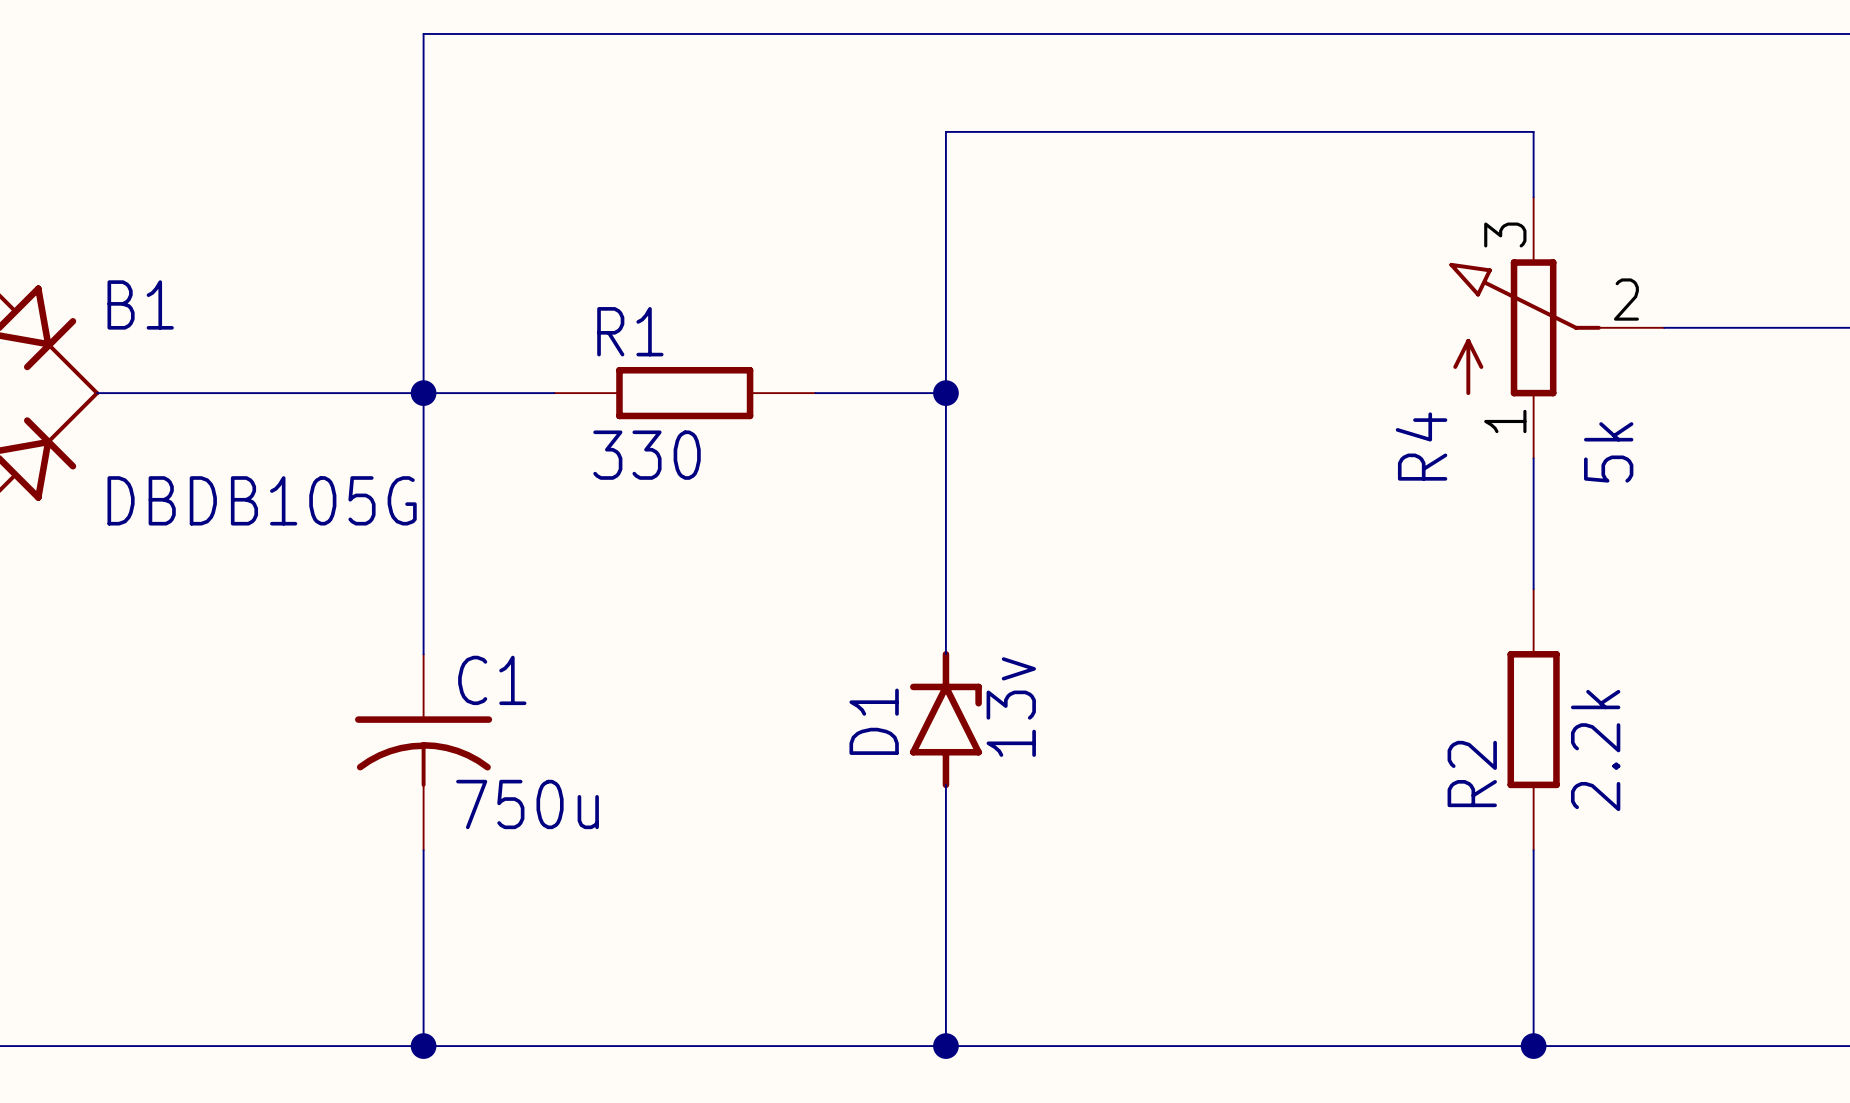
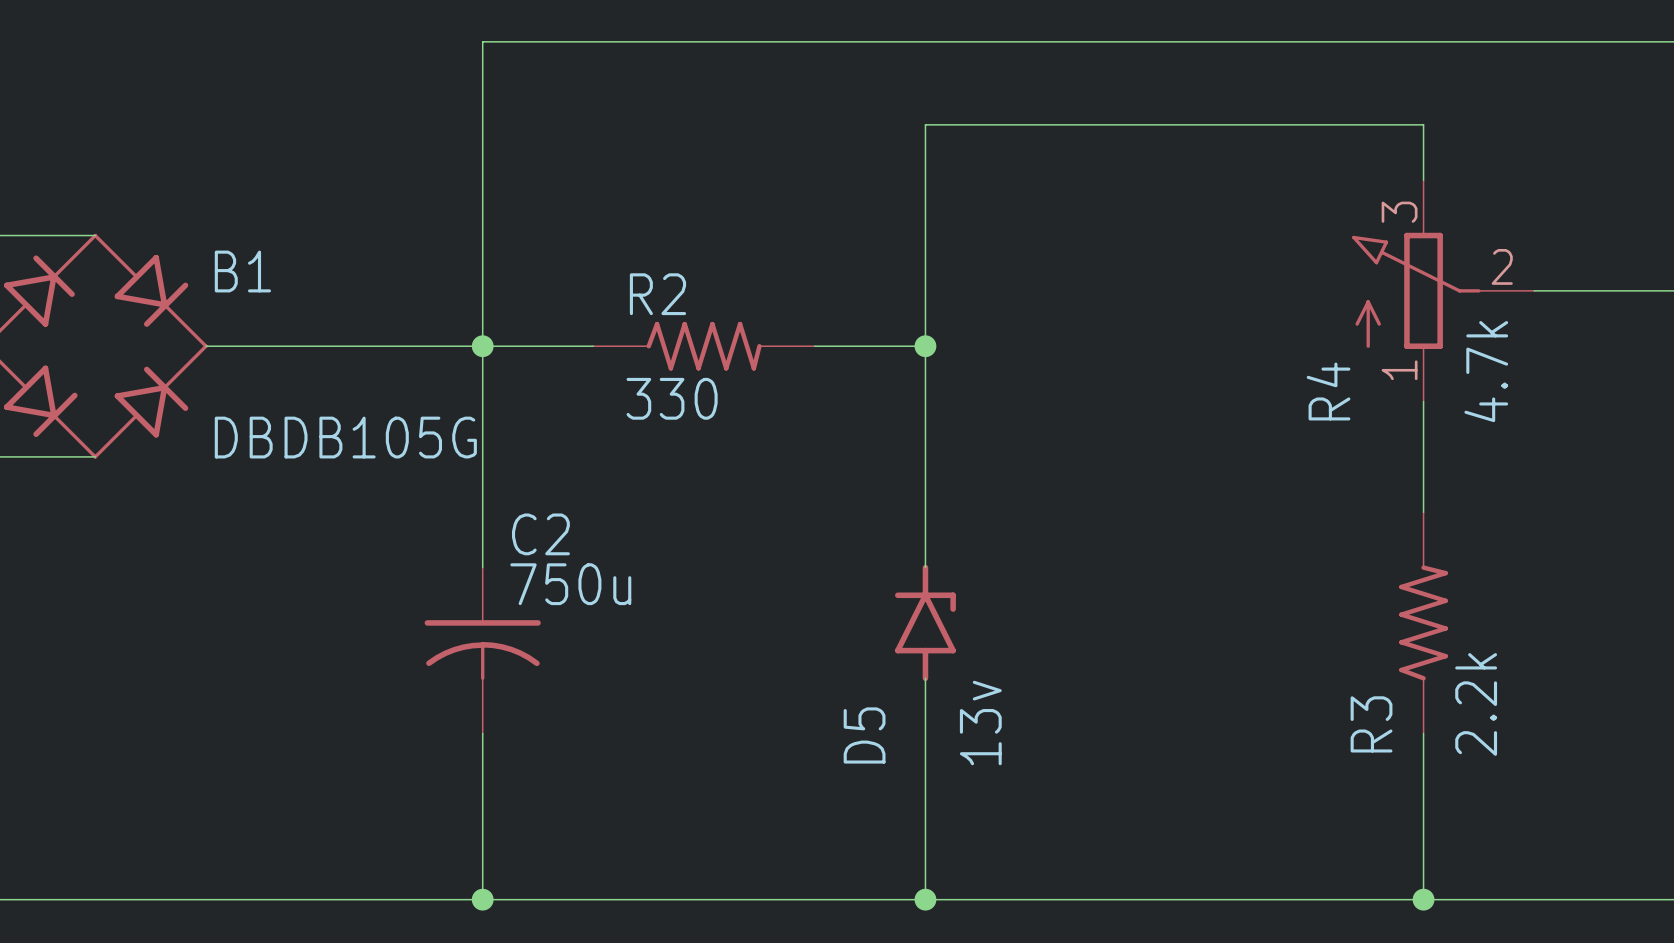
R1: 330 (684, 393) -> none
R4 value: 5k (1608, 452) -> 4.7k (1486, 371)
R2 symbol: [1507, 589, 1560, 851] -> [593, 321, 815, 371]
C1 name: C1 (492, 680) -> C2 (540, 534)
D1 value position: 13v (1011, 707) -> 13v (980, 723)
R3: none -> 2.2k (1423, 622)
D1 name: D1 (874, 721) -> D5 (864, 735)
R2 value: 2.2k (1595, 750) -> 330 (672, 398)
R2 name position: R2 (1472, 773) -> R2 (657, 294)
C1 value position: 750u (527, 804) -> 750u (570, 584)

